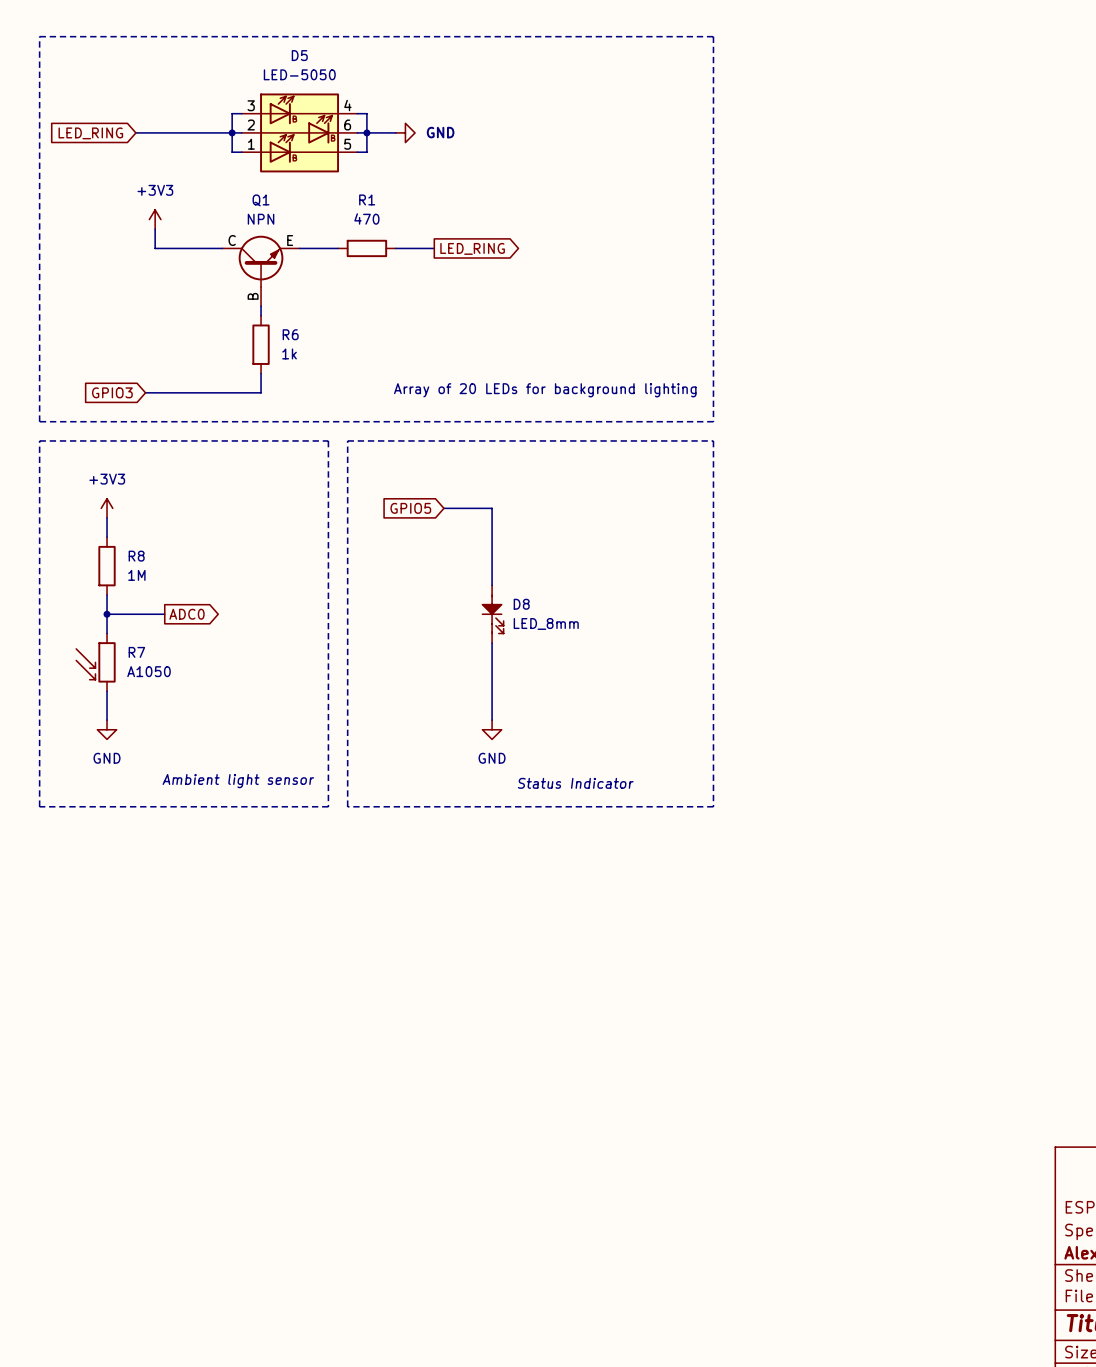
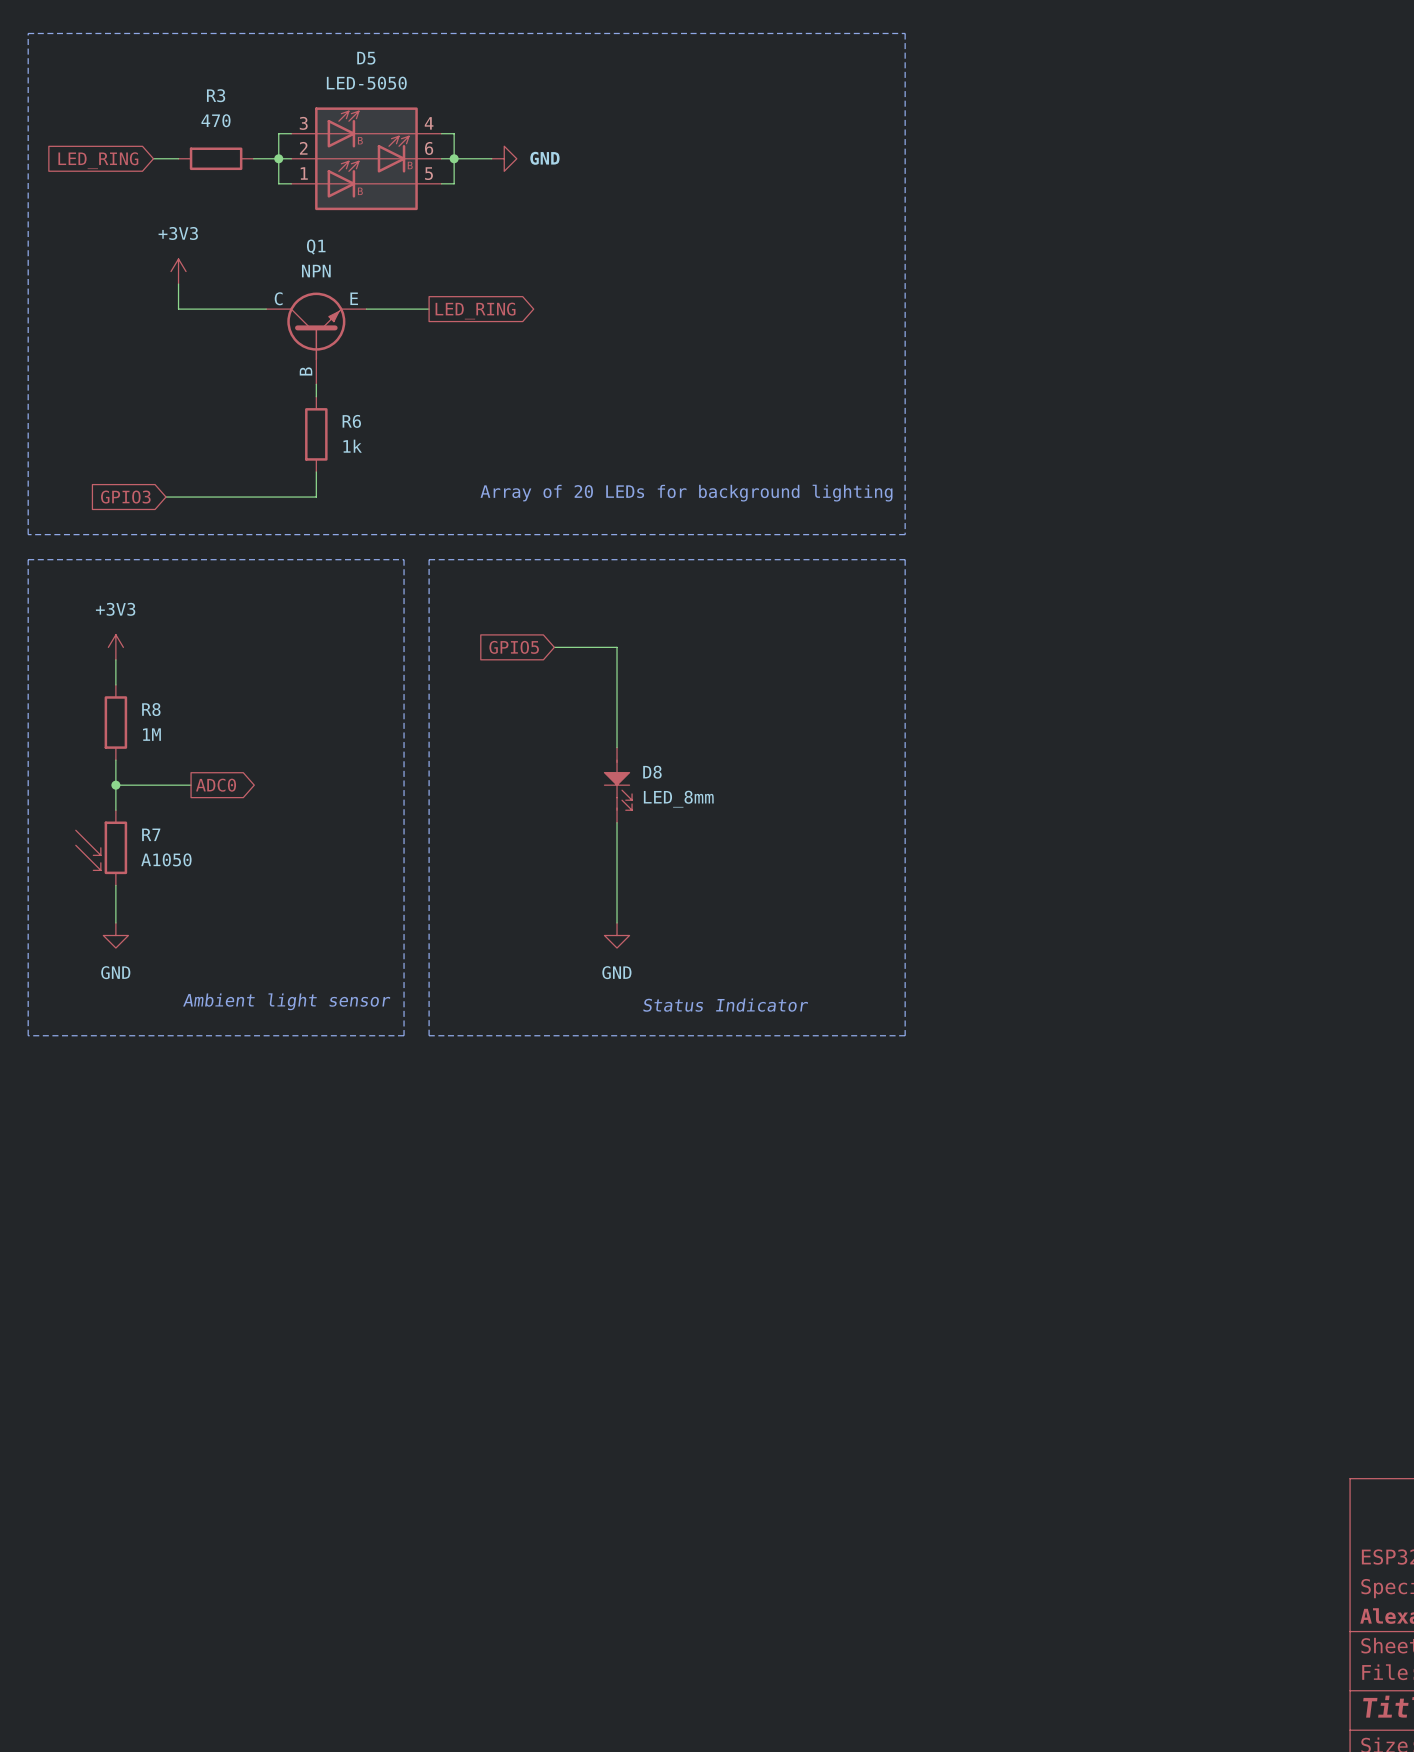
wire: (155, 132) (212, 132) -> none
R3: none -> 470 (216, 158)
R1: 470 (366, 248) -> none
wire: (395, 248) (434, 248) -> none
global label position: LED_RING (472, 248) -> LED_RING (475, 311)

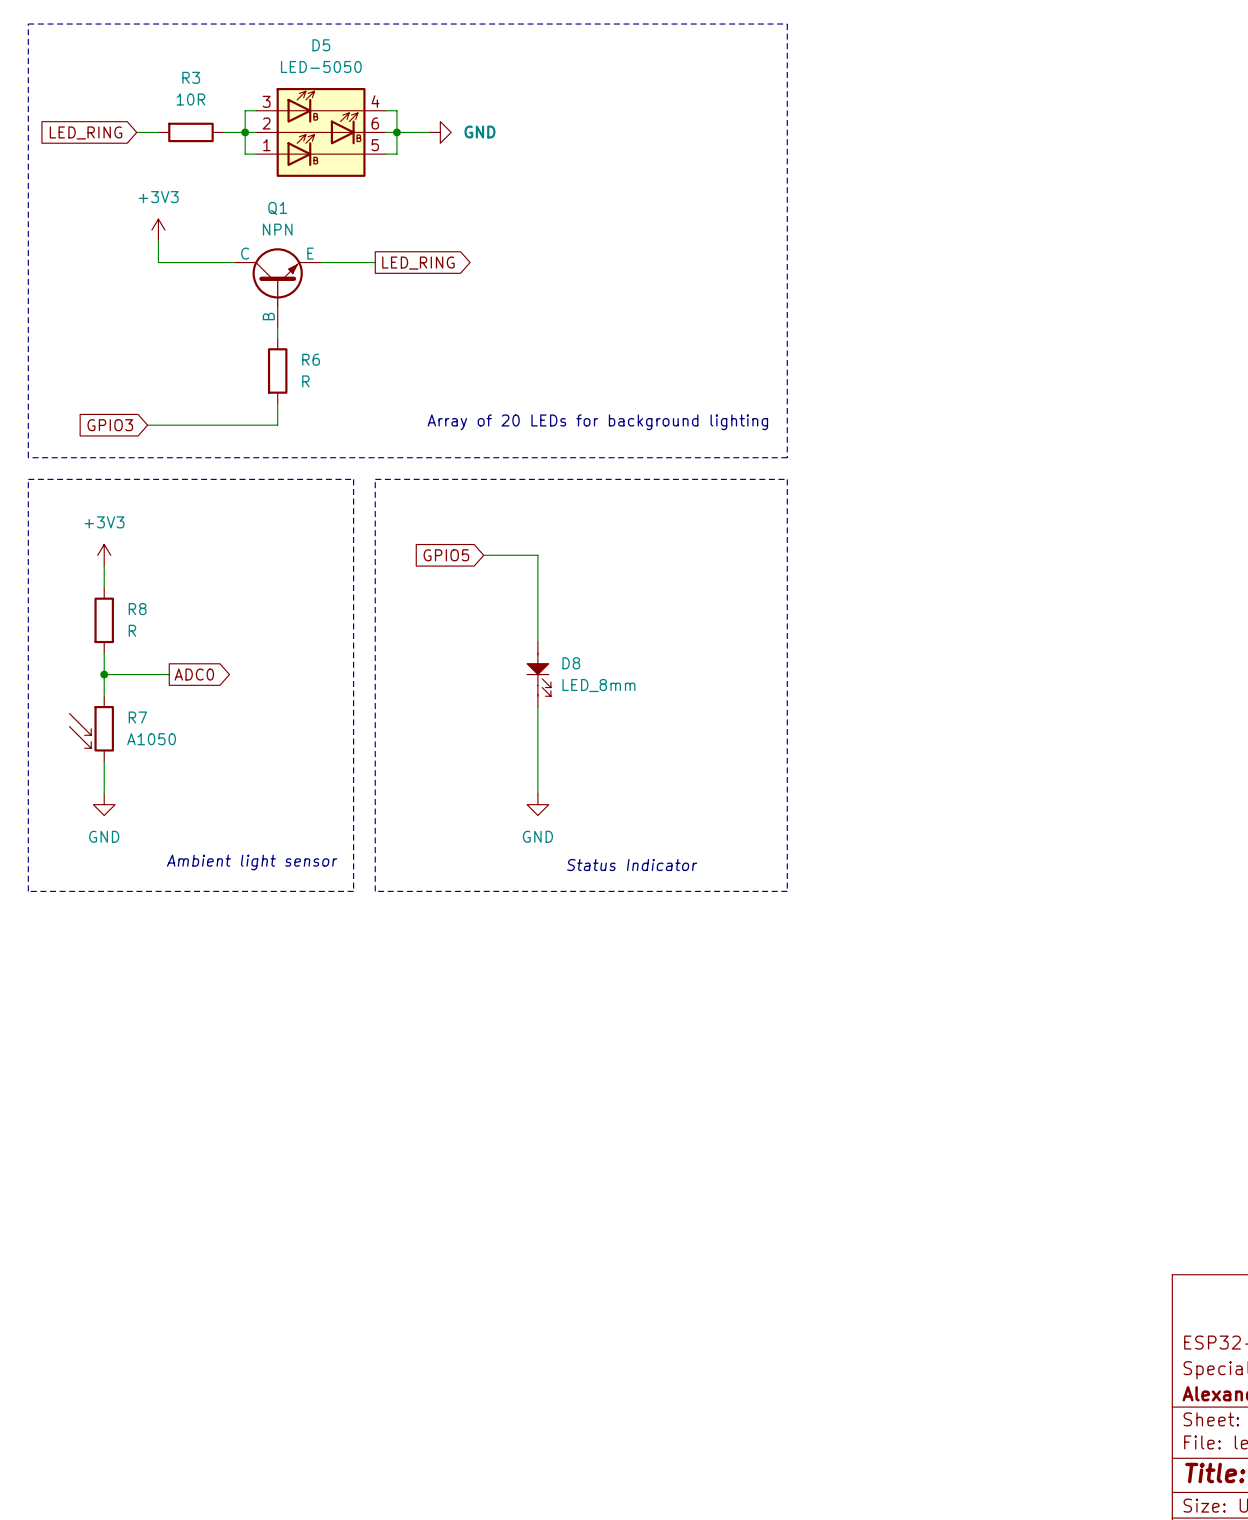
R3 value: 470 (215, 120) -> 10R (190, 99)
R6 value: 1k (352, 446) -> R (305, 381)
R8 value: 1M (151, 734) -> R (132, 630)

